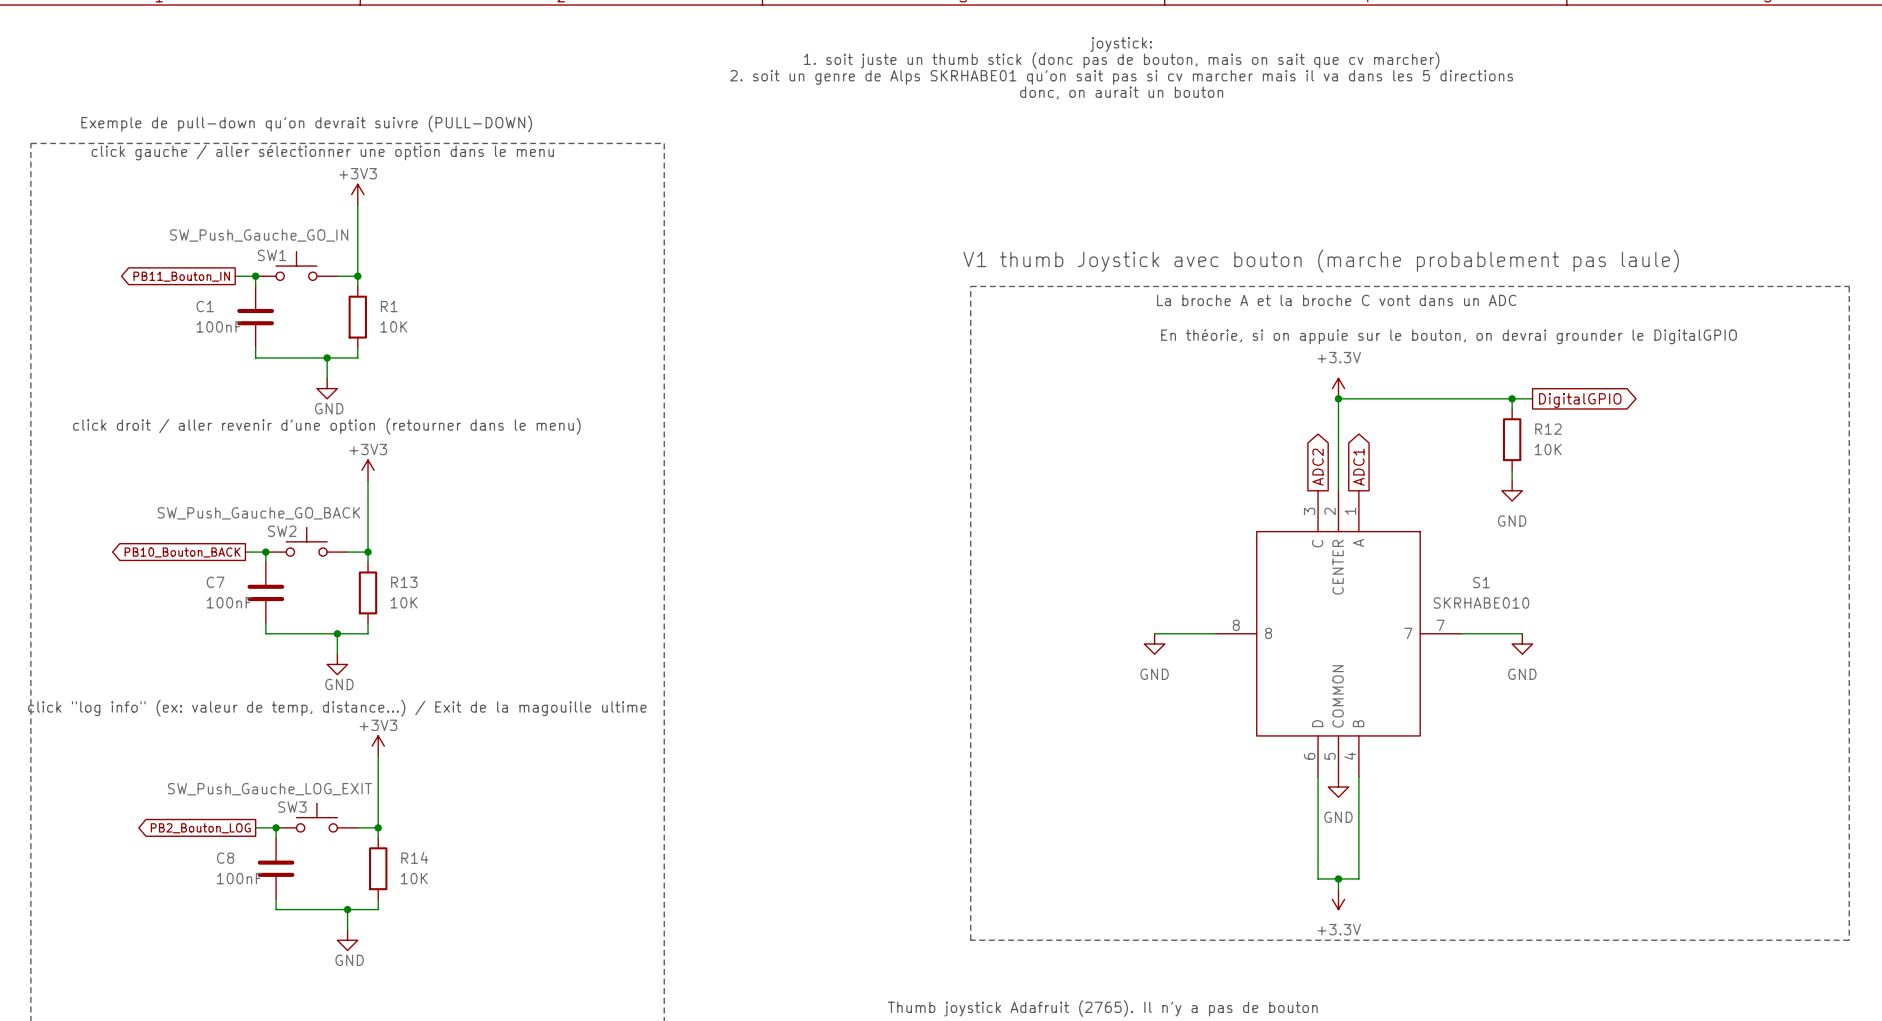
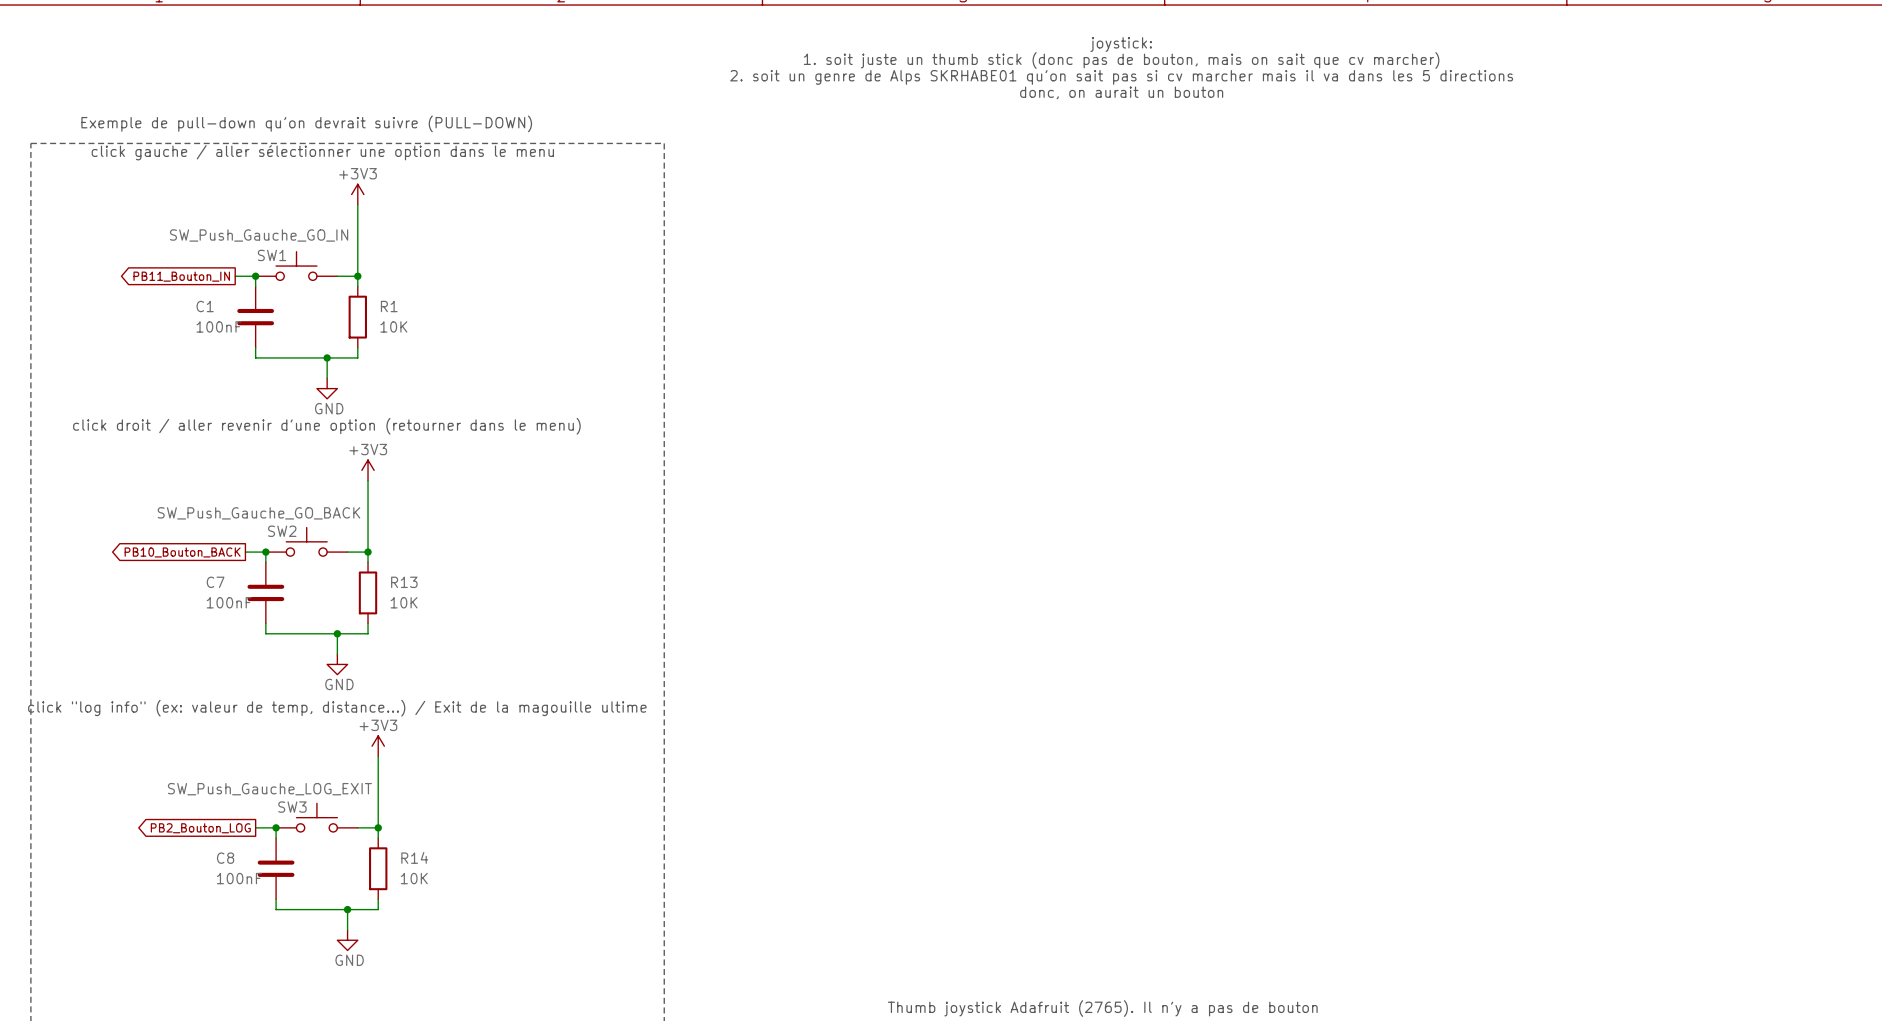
text: V1 thumb Joystick avec bouton (marche probablement pas laule) (1321, 261) -> none
line: (970, 286) (1849, 286) (1849, 940) (970, 940) (970, 286) -> none
text: La broche A et la broche C vont dans un ADC (1336, 300) -> none
text: En théorie, si on appuie sur le bouton, on devrai grounder le DigitalGPIO (1449, 336) -> none
power symbol: +3.3V (1338, 388) -> none
junction: (1338, 398) -> none
wire: (1512, 398) (1512, 409) -> none
junction: (1512, 398) -> none
wire: (1532, 398) (1338, 398) (1338, 490) -> none
global label: DigitalGPIO (1580, 400) -> none
R12: 10K (1512, 439) -> none
global label: ADC2 (1318, 467) -> none
global label: ADC1 (1358, 467) -> none
wire: (1512, 470) (1512, 480) -> none
power symbol: GND (1512, 490) -> none
wire: (1154, 633) (1215, 633) -> none
S1: SKRHABE010 (1338, 633) -> none
wire: (1461, 633) (1522, 633) -> none
power symbol: GND (1154, 644) -> none
power symbol: GND (1522, 644) -> none
wire: (1318, 776) (1318, 878) (1358, 878) (1358, 776) -> none
power symbol: GND (1338, 787) -> none
wire: (1338, 878) (1338, 889) -> none
junction: (1338, 878) -> none
power symbol: +3.3V (1338, 899) -> none

